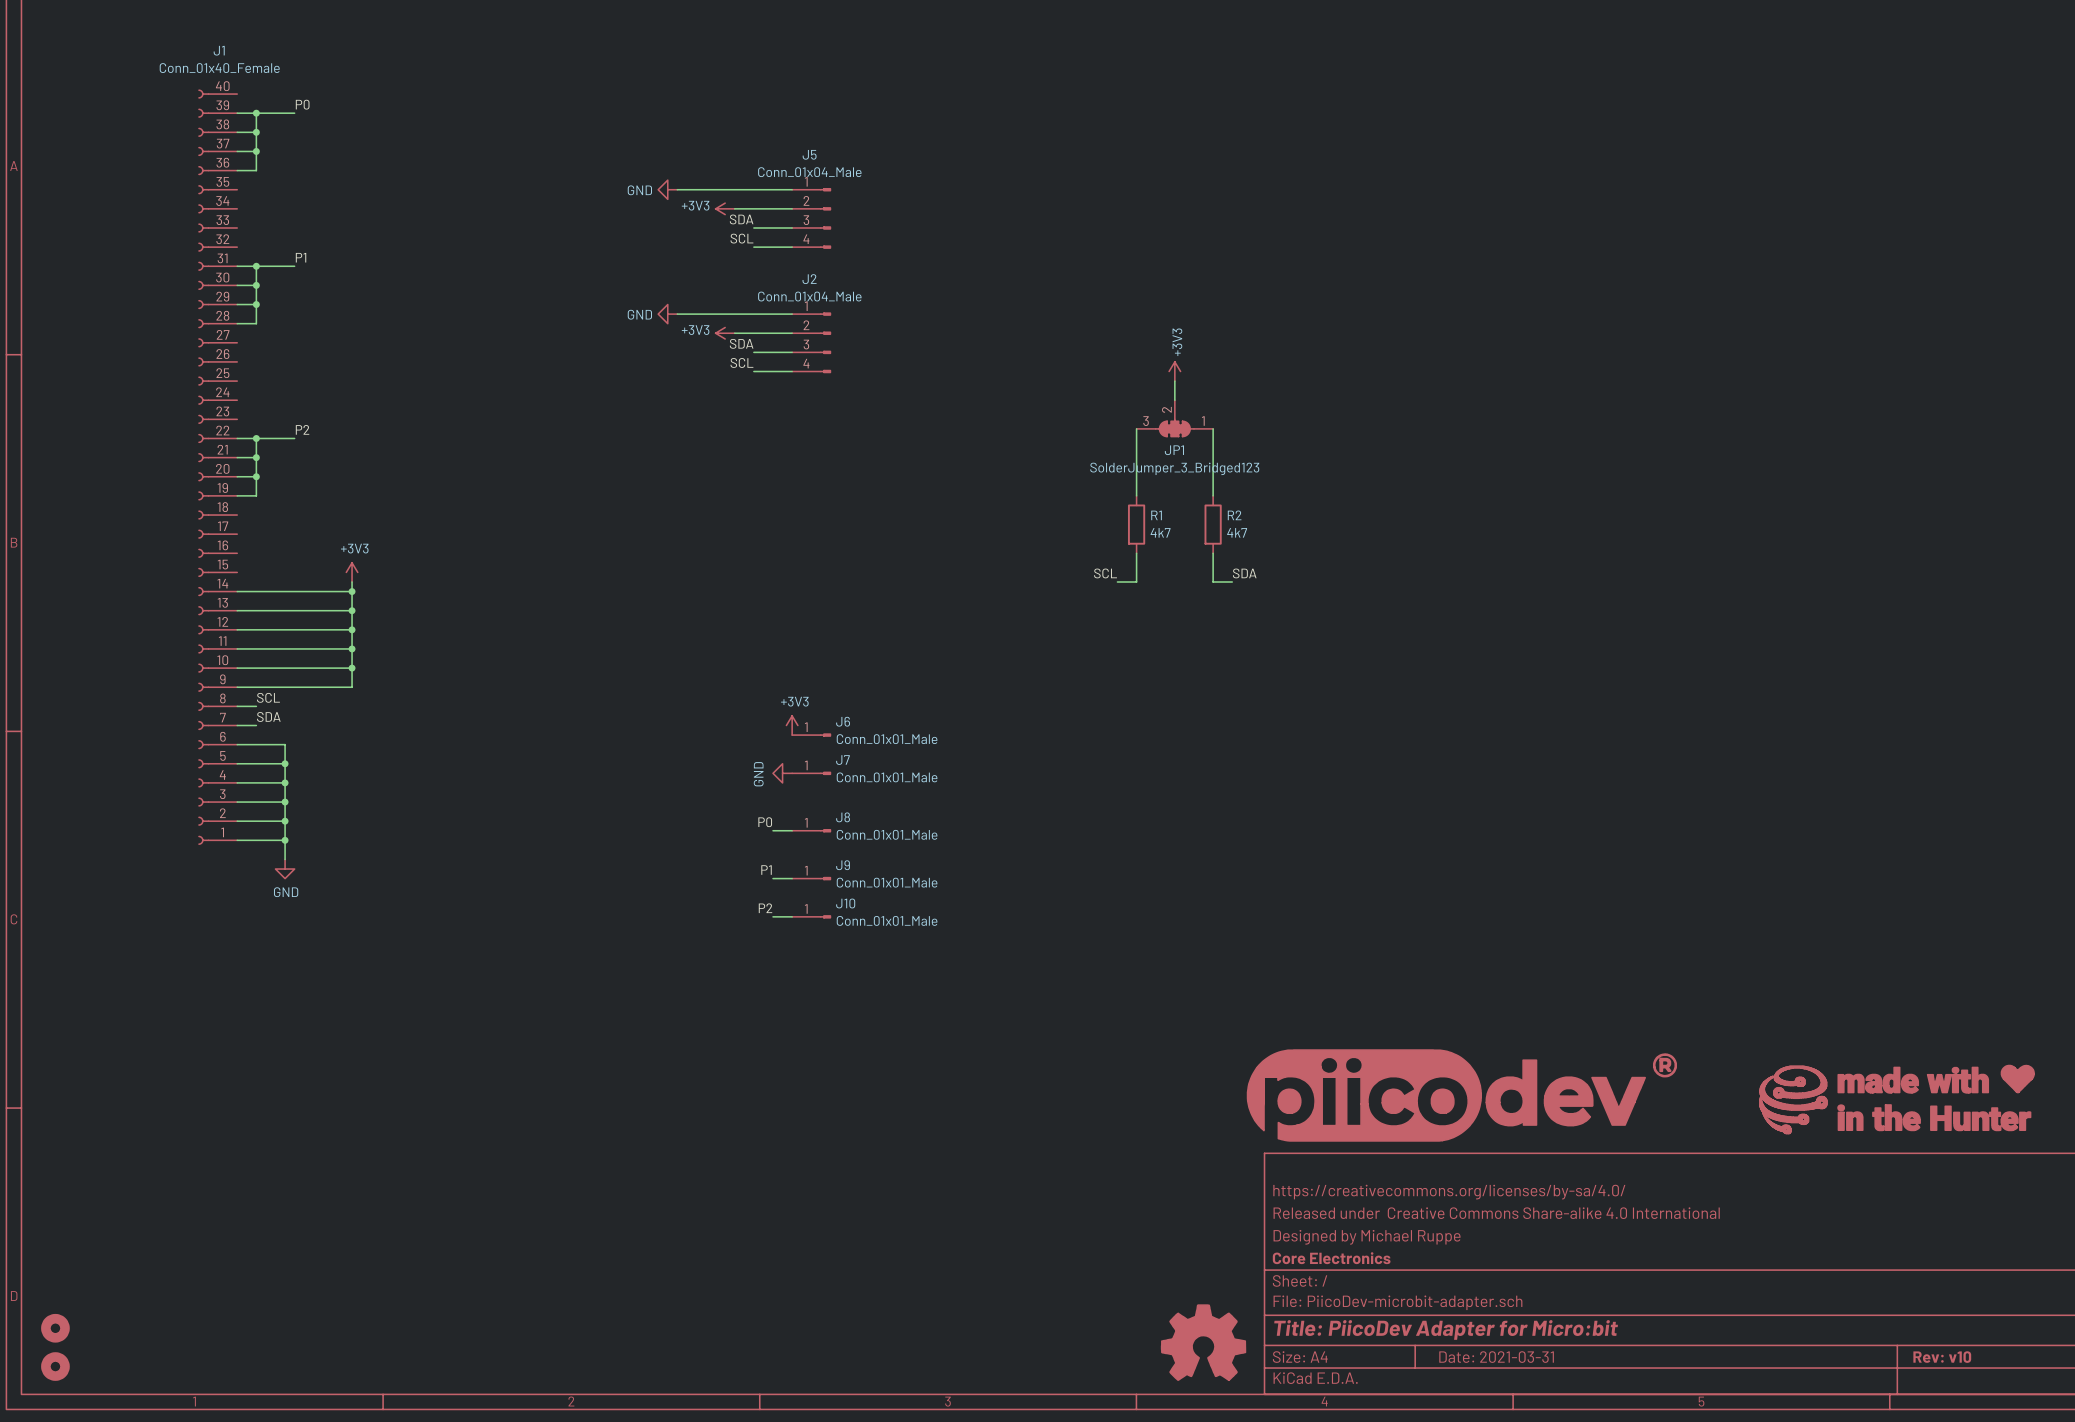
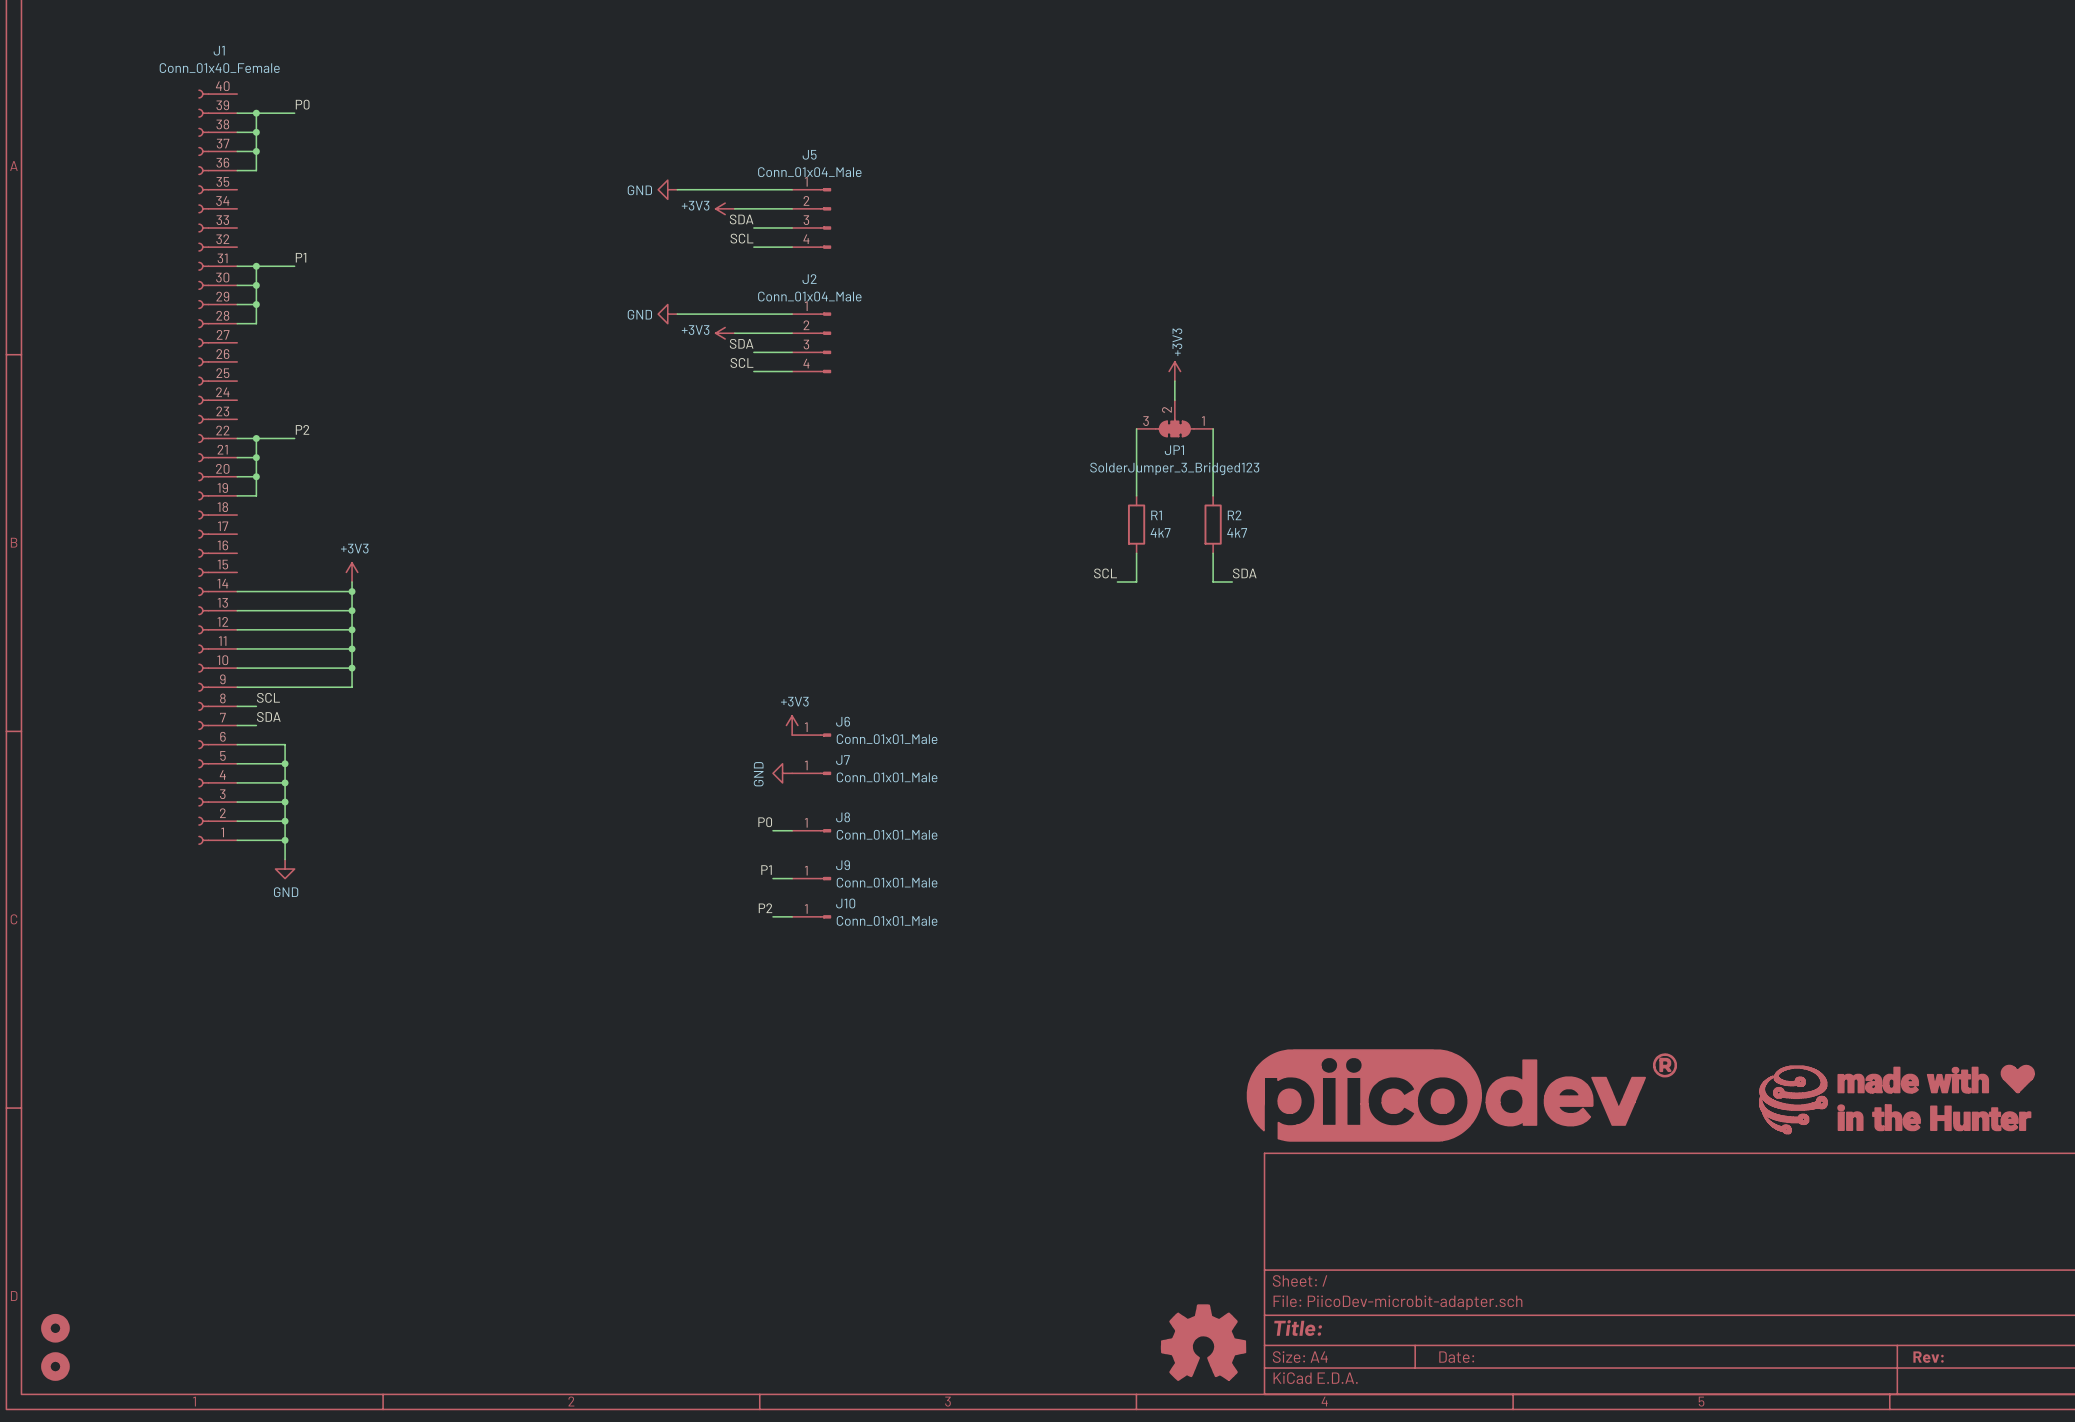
title block: https://creativecommons.org/licenses/by-sa/4.0/ (1449, 1192) -> none
title block: Released under Creative Commons Share-alike 4.0 International (1496, 1213) -> none
title block: Designed by Michael Ruppe (1367, 1237) -> none
title block: Core Electronics (1331, 1258) -> none
title block: Title: PiicoDev Adapter for Micro:bit (1446, 1329) -> Title: (1298, 1328)
title block: Date: 2021-03-31 (1496, 1357) -> Date: (1456, 1357)
title block: Rev: v10 (1942, 1357) -> Rev: (1928, 1357)

